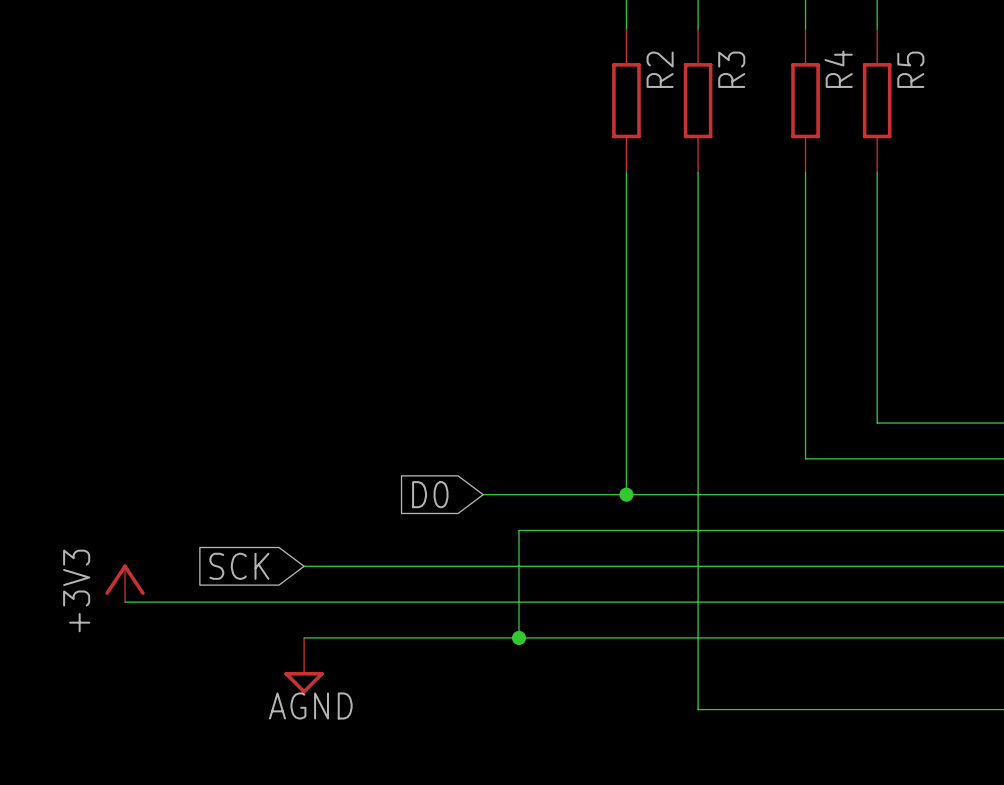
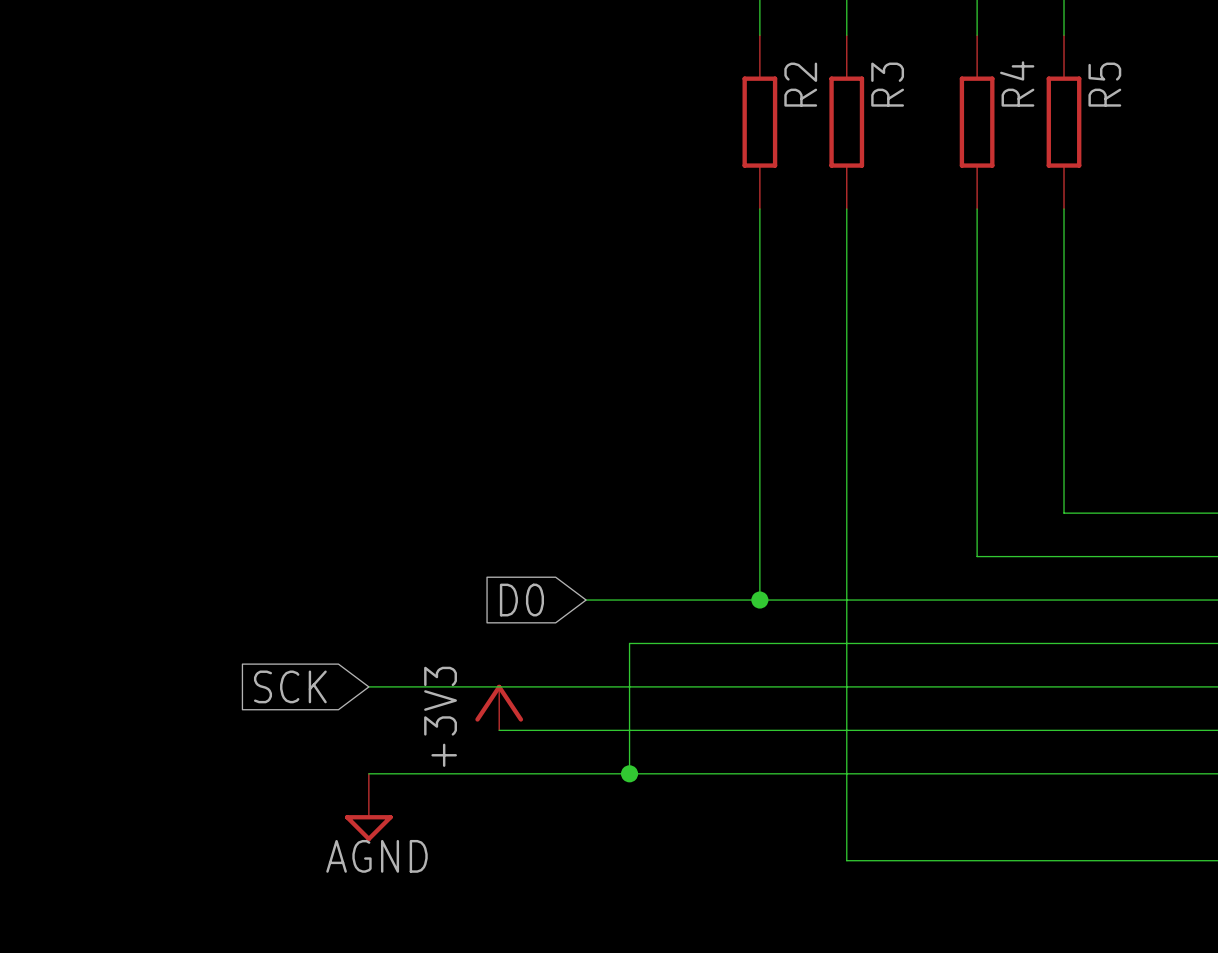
power symbol position: +3V3 (125, 583) -> +3V3 (499, 707)
wire: (125, 602) (411, 602) -> none

